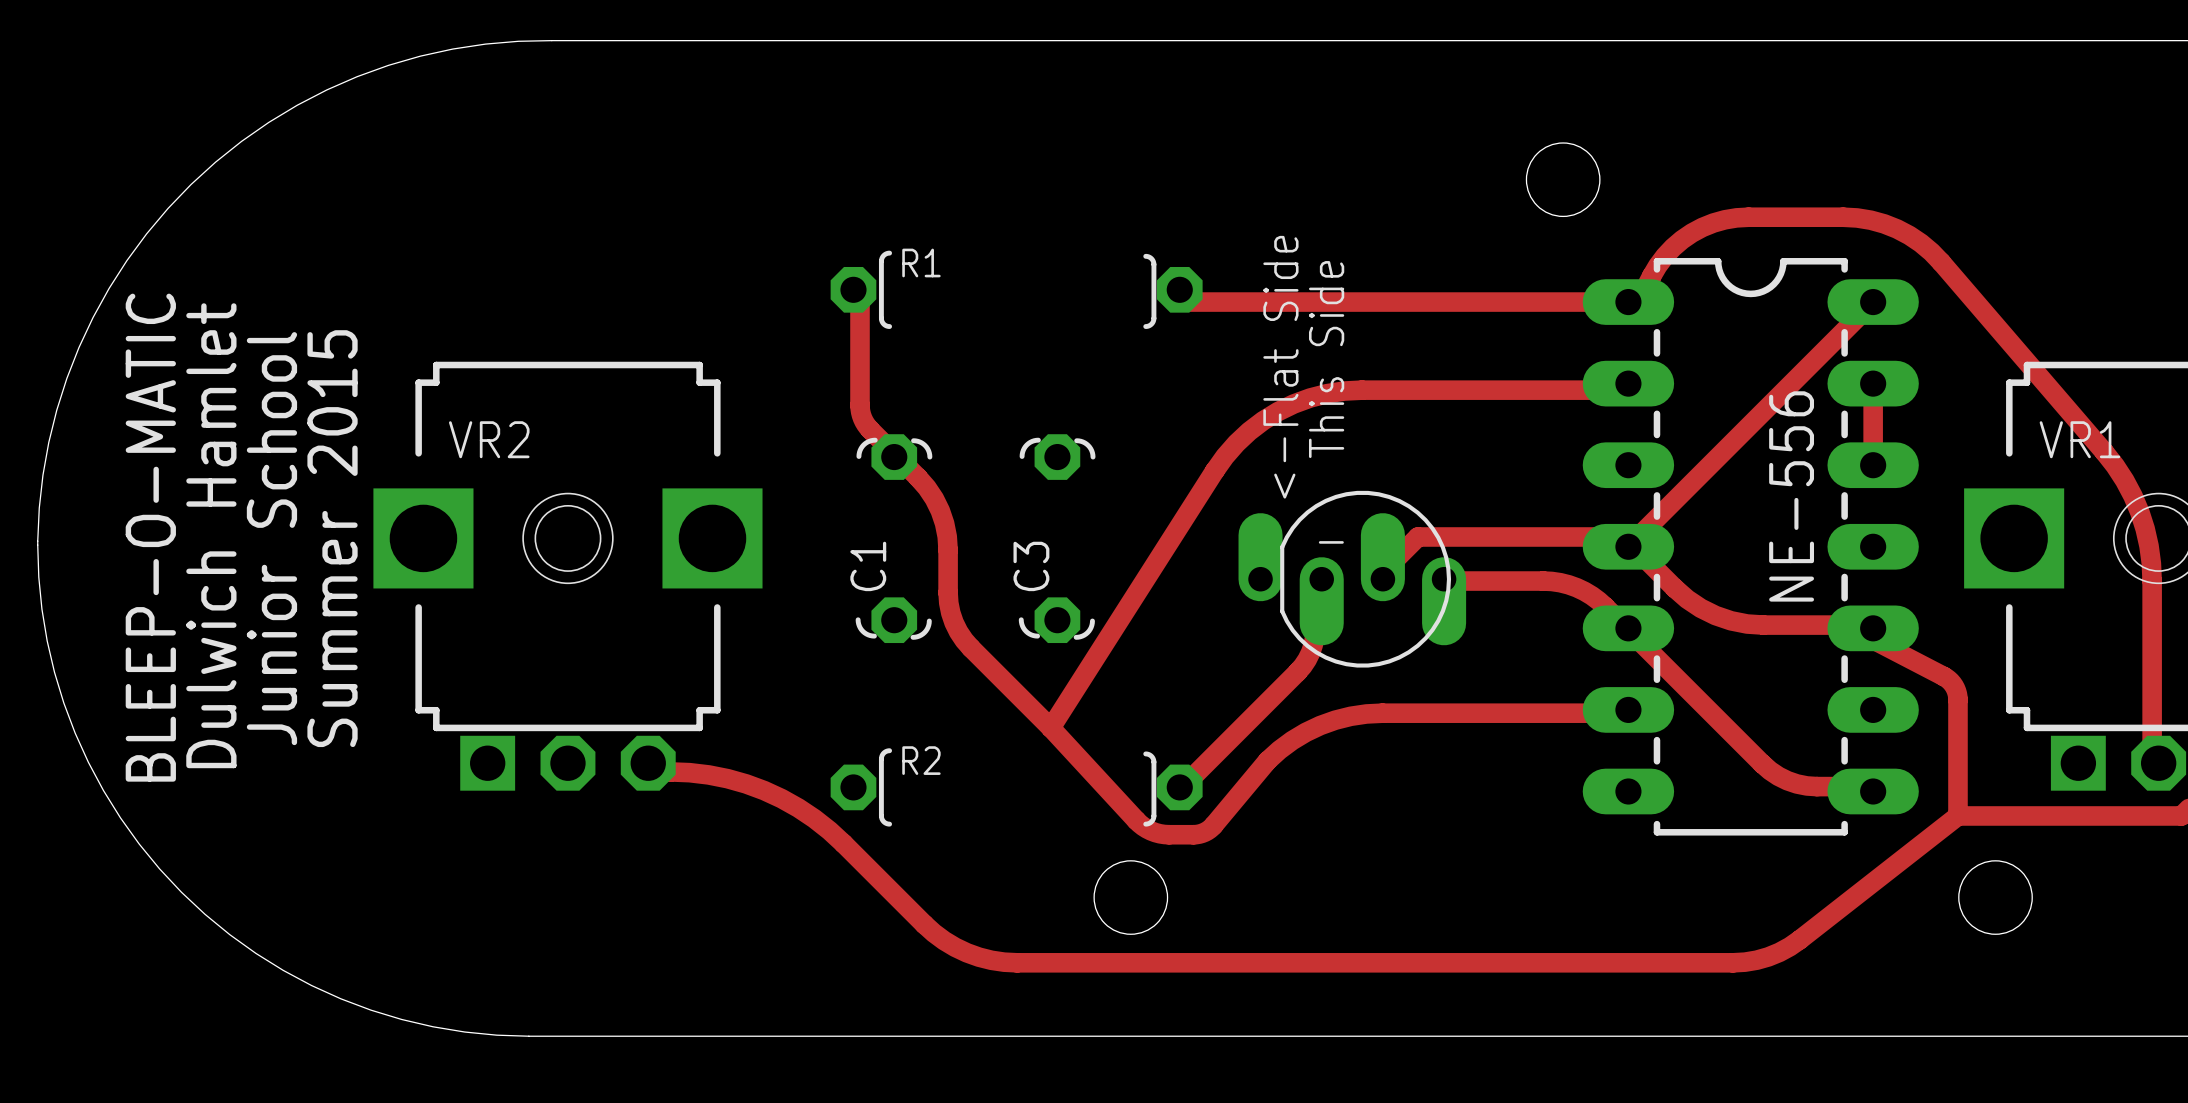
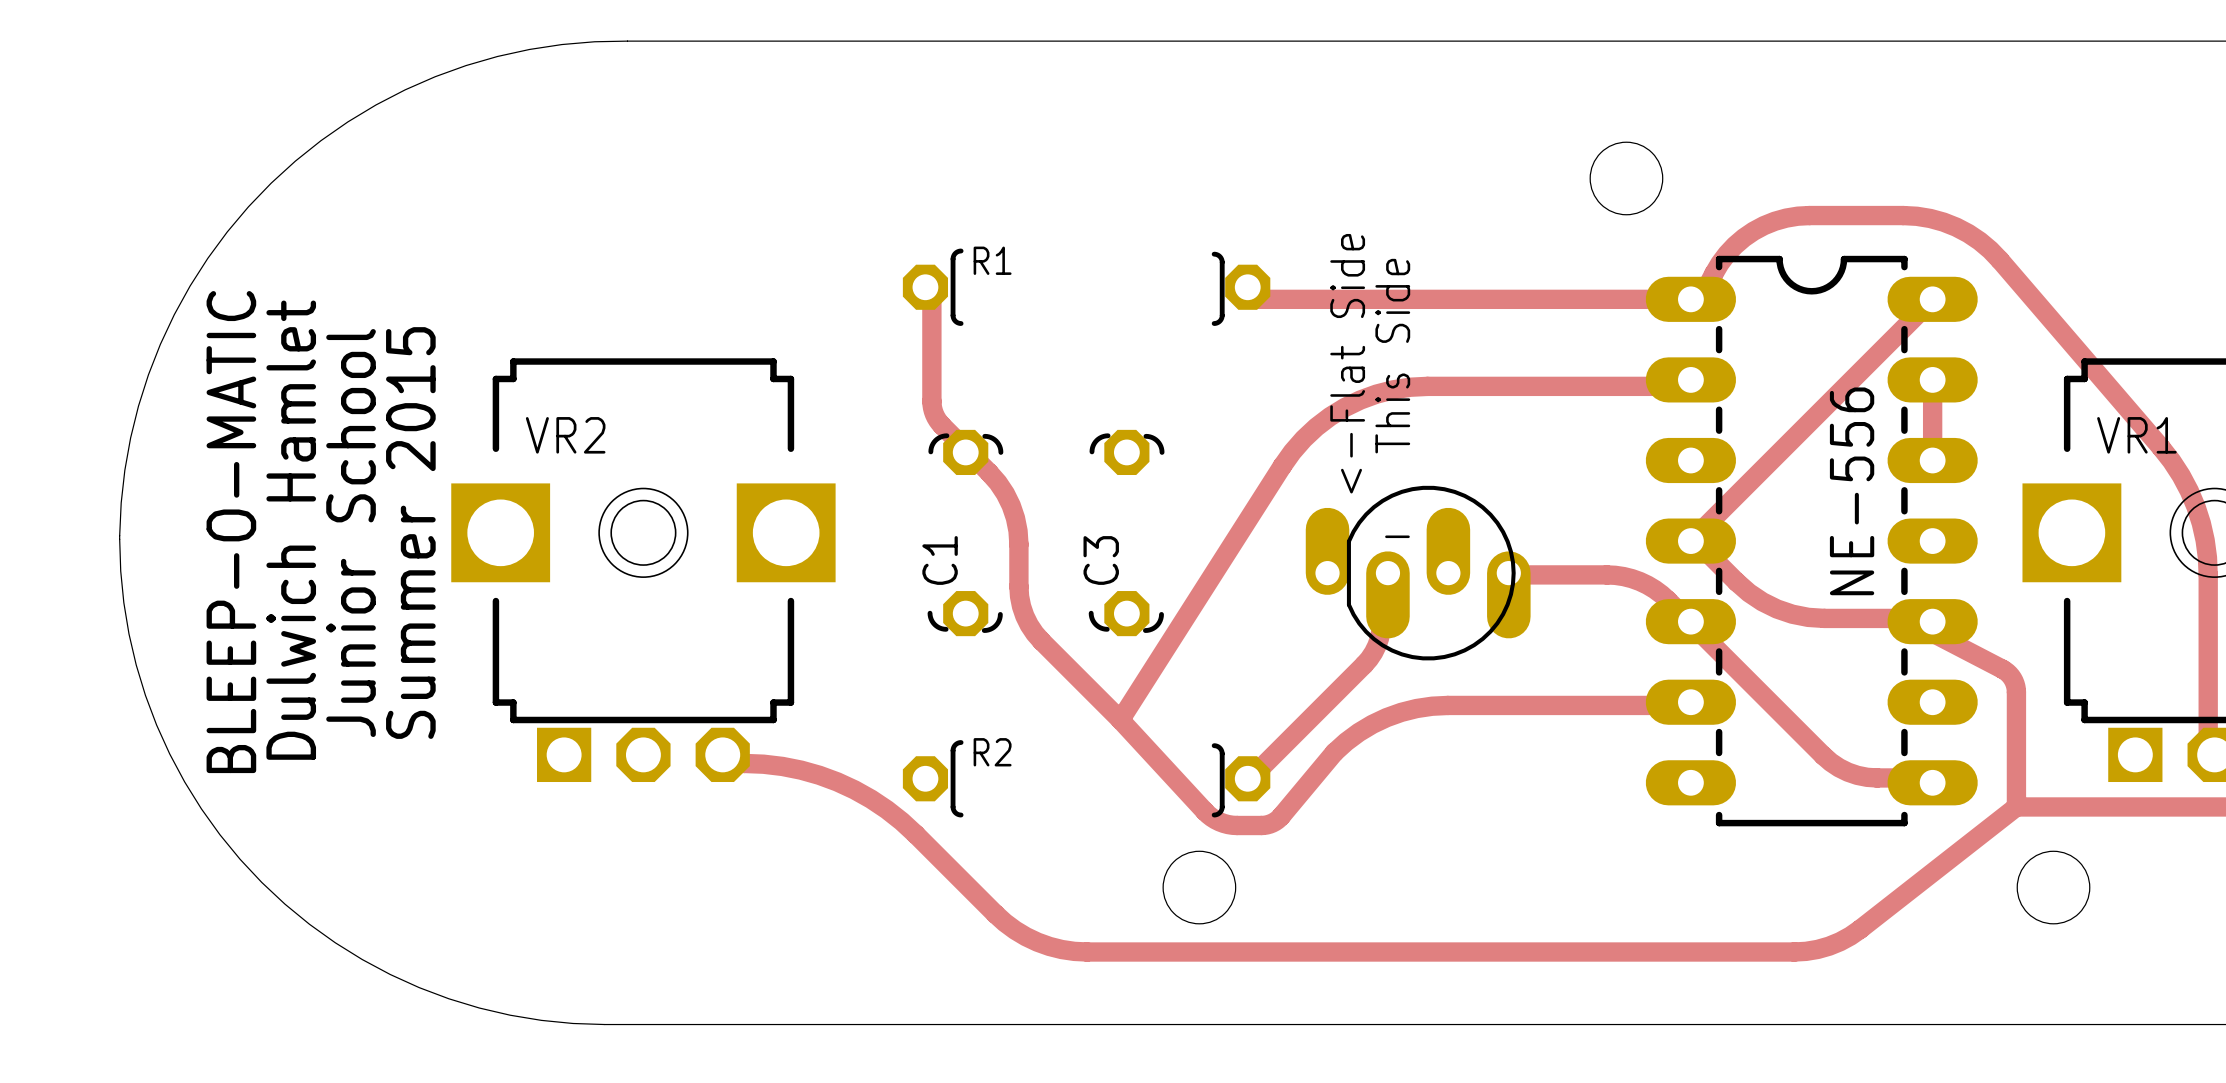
track: (1628, 546) (1623, 536) (1417, 536) (1388, 566) (1382, 579) -> none

